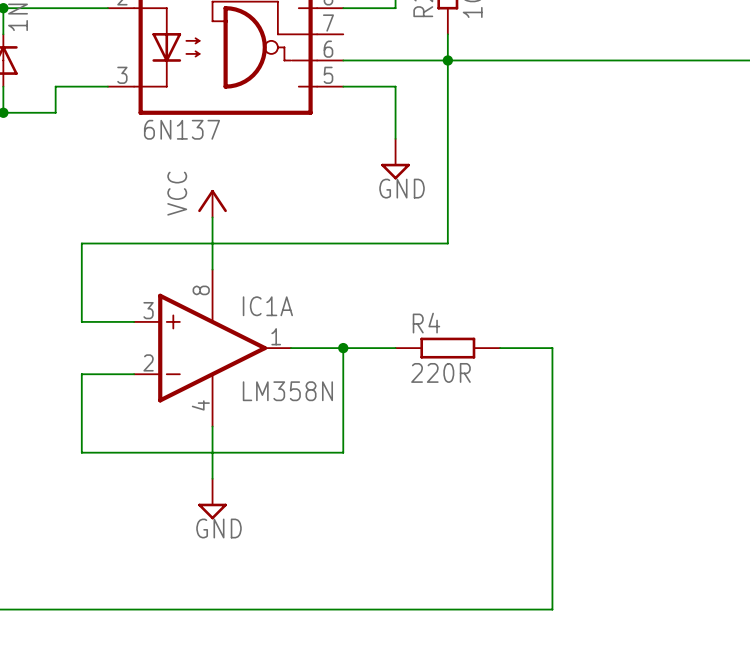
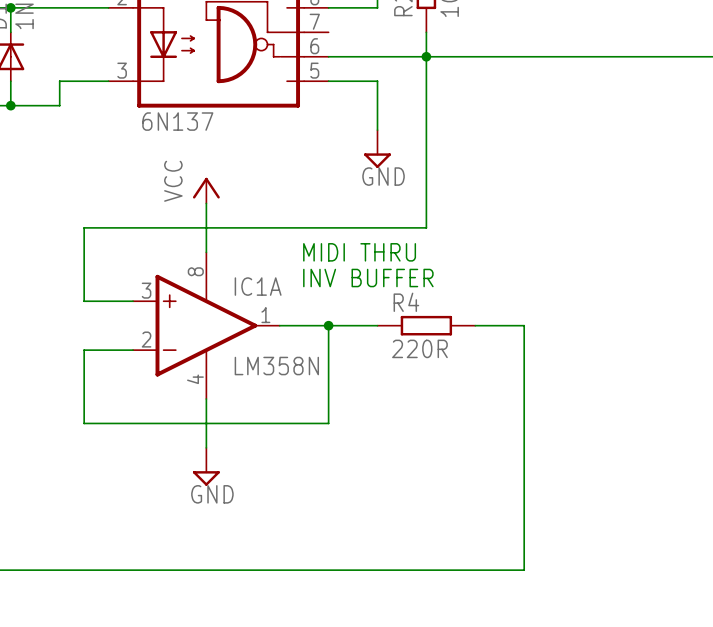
text: none -> MIDI THRU (359, 252)
text: none -> INV BUFFER (368, 278)

